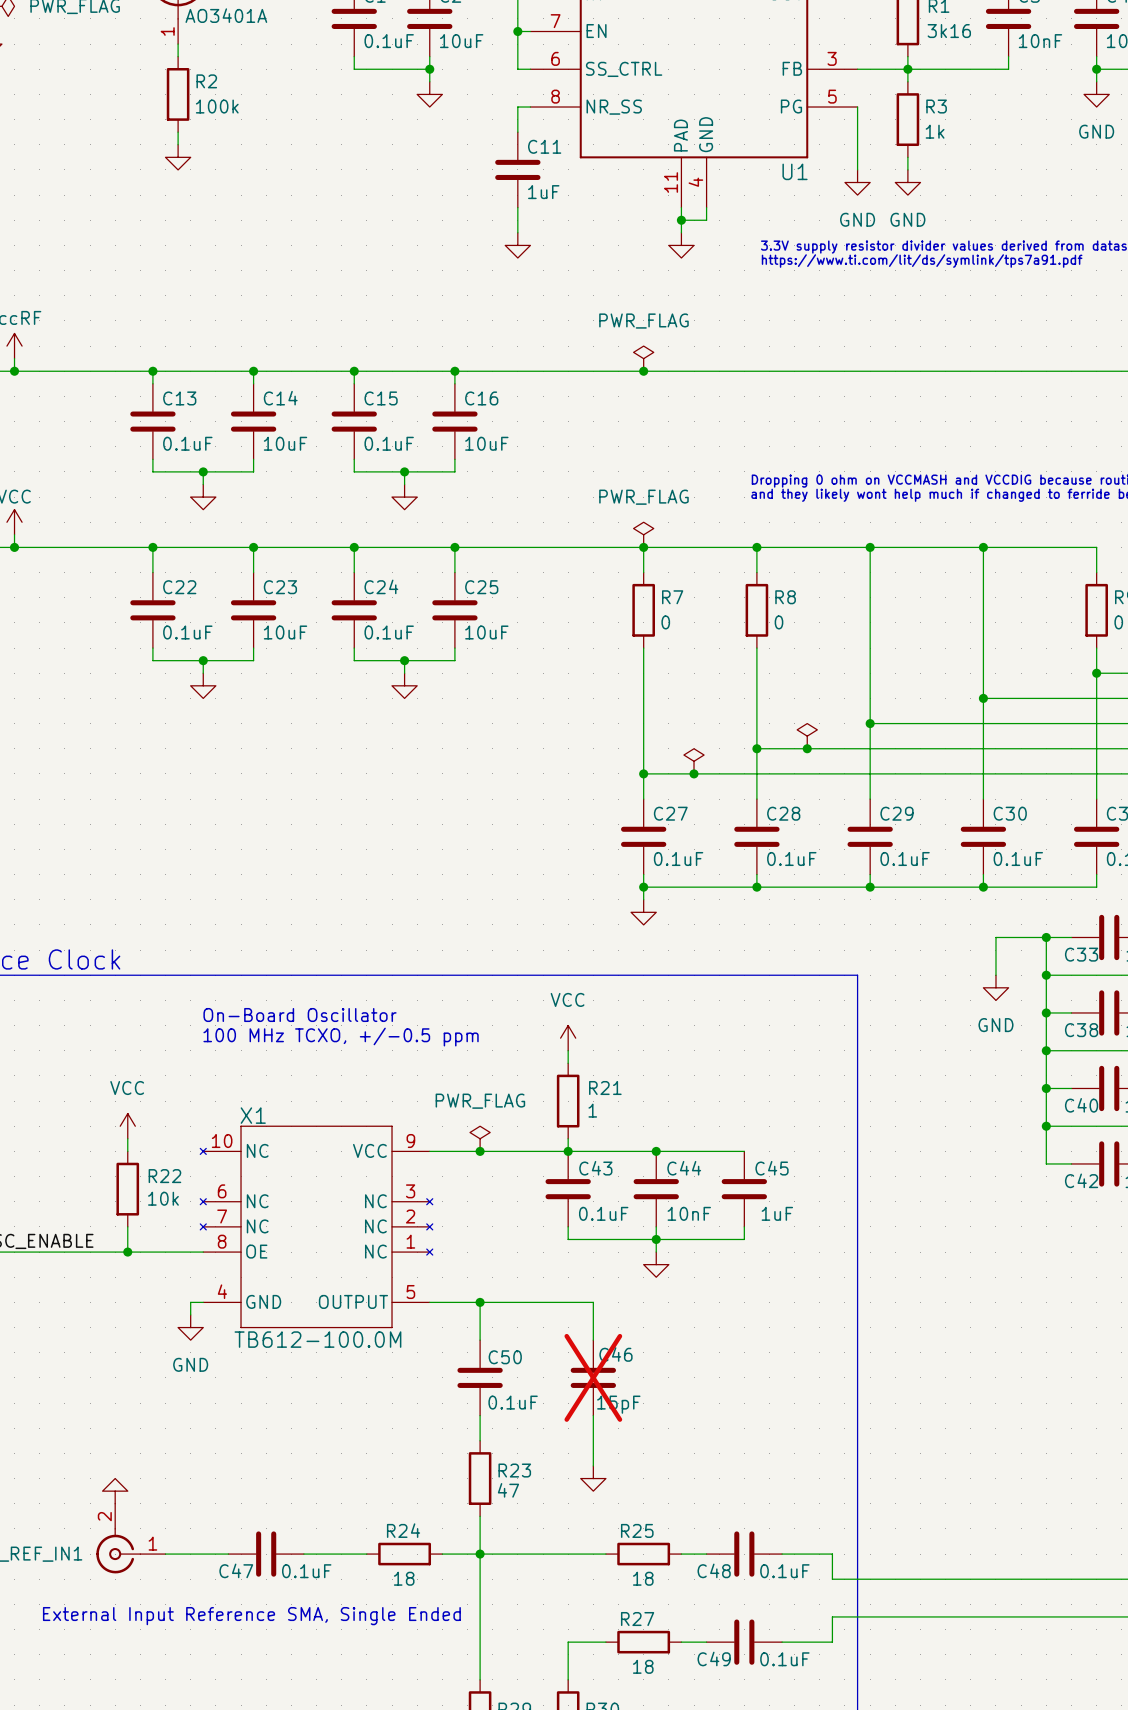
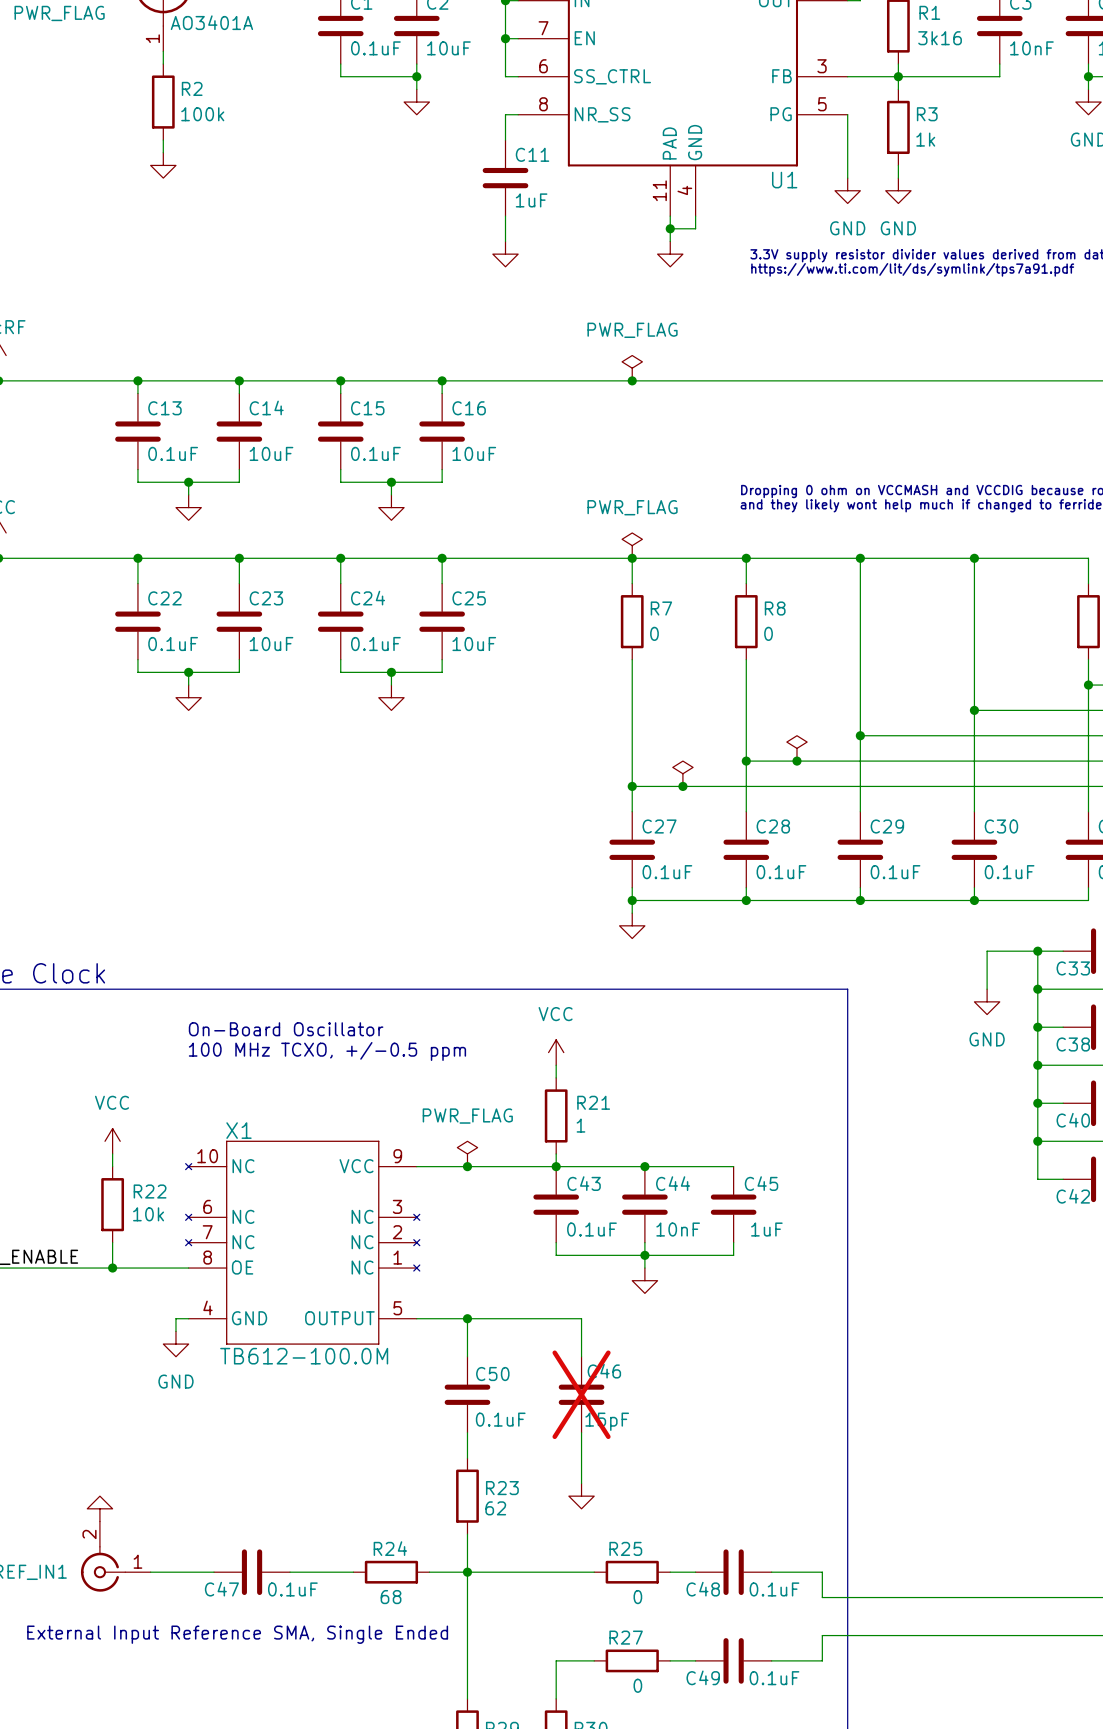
R23 value: 47 (508, 1490) -> 62 (495, 1508)
R24 value: 18 (404, 1578) -> 68 (391, 1597)
R25 value: 18 (643, 1578) -> 0 (637, 1597)
R27 value: 18 (643, 1666) -> 0 (637, 1685)

